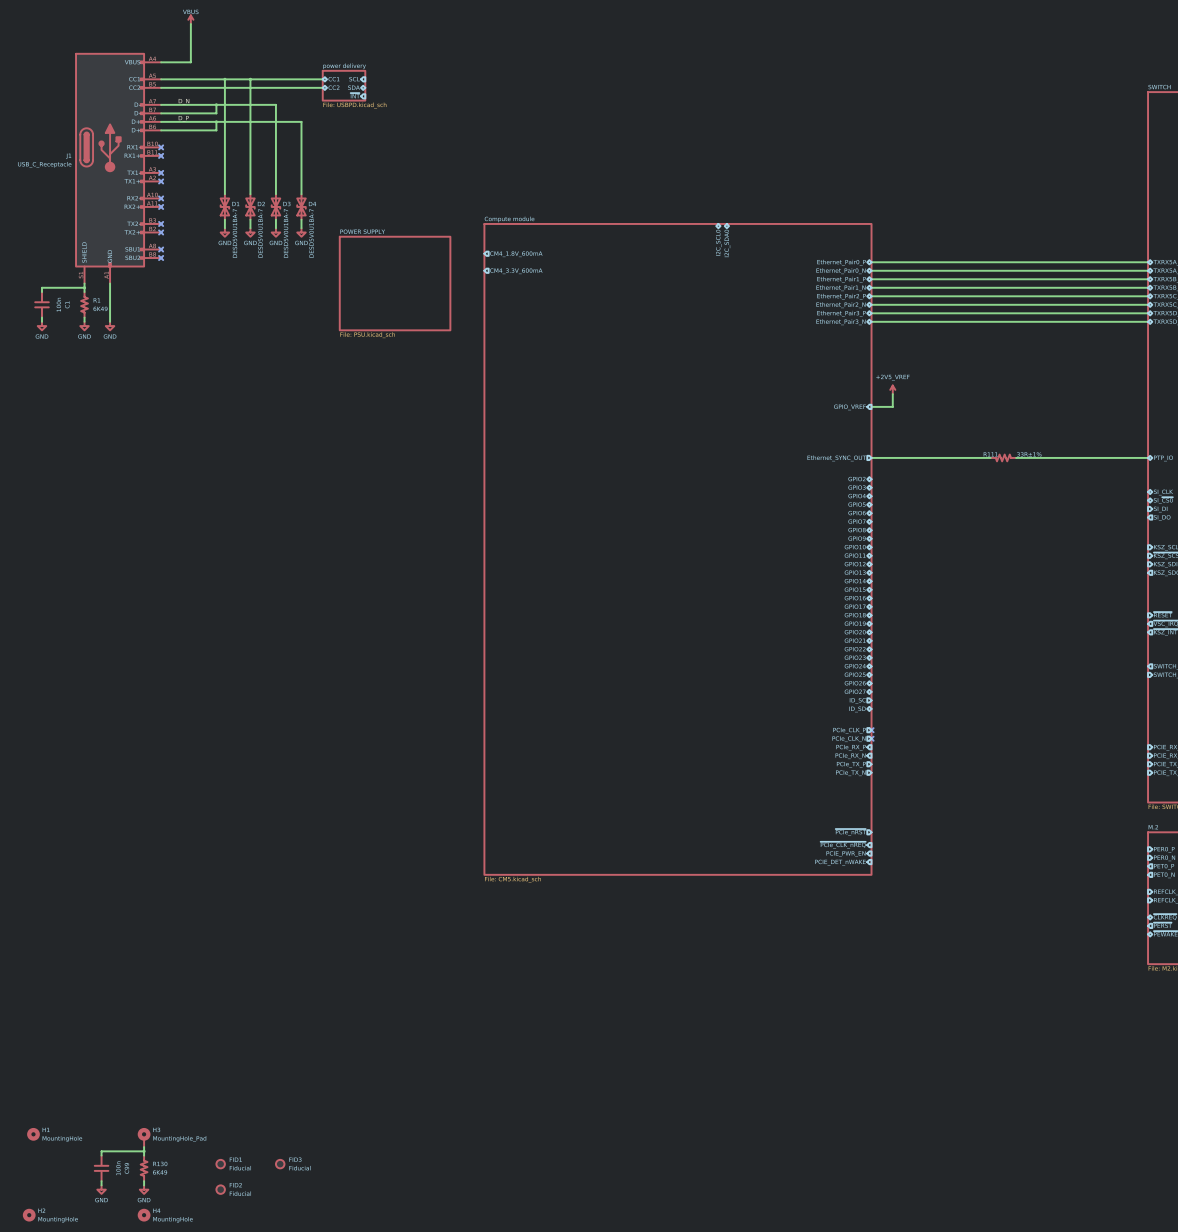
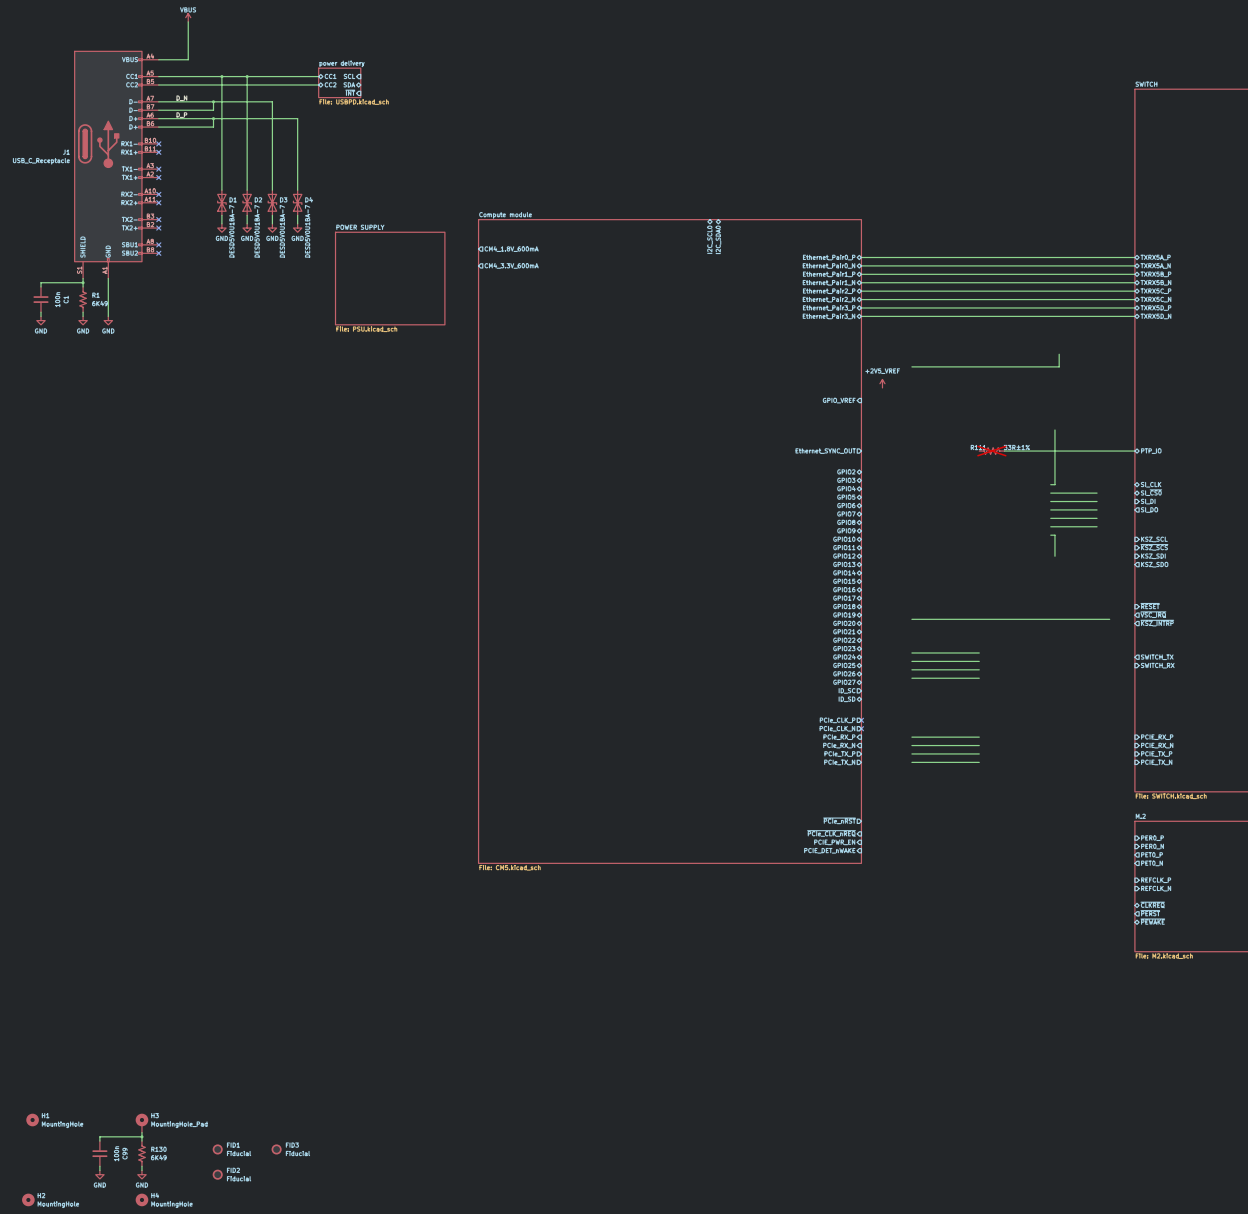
wire: none -> (1059, 354) (1059, 366) (911, 366)
wire: (892, 394) (892, 406) (871, 406) -> none
wire: none -> (1054, 430) (1054, 484) (1050, 484)
wire: (871, 457) (990, 457) -> none
part do-not-place cross: none -> (991, 451)
wire: none -> (1050, 493) (1097, 493)
wire: none -> (1050, 501) (1097, 501)
wire: none -> (1050, 509) (1097, 509)
wire: none -> (1050, 518) (1097, 518)
wire: none -> (1050, 526) (1097, 526)
wire: none -> (1050, 535) (1054, 535) (1054, 556)
wire: none -> (911, 619) (1109, 619)
wire: none -> (911, 652) (979, 652)
wire: none -> (911, 661) (979, 661)
wire: none -> (911, 669) (979, 669)
wire: none -> (911, 678) (979, 678)
wire: none -> (911, 737) (979, 737)
wire: none -> (911, 745) (979, 745)
wire: none -> (911, 753) (979, 753)
wire: none -> (911, 762) (979, 762)

